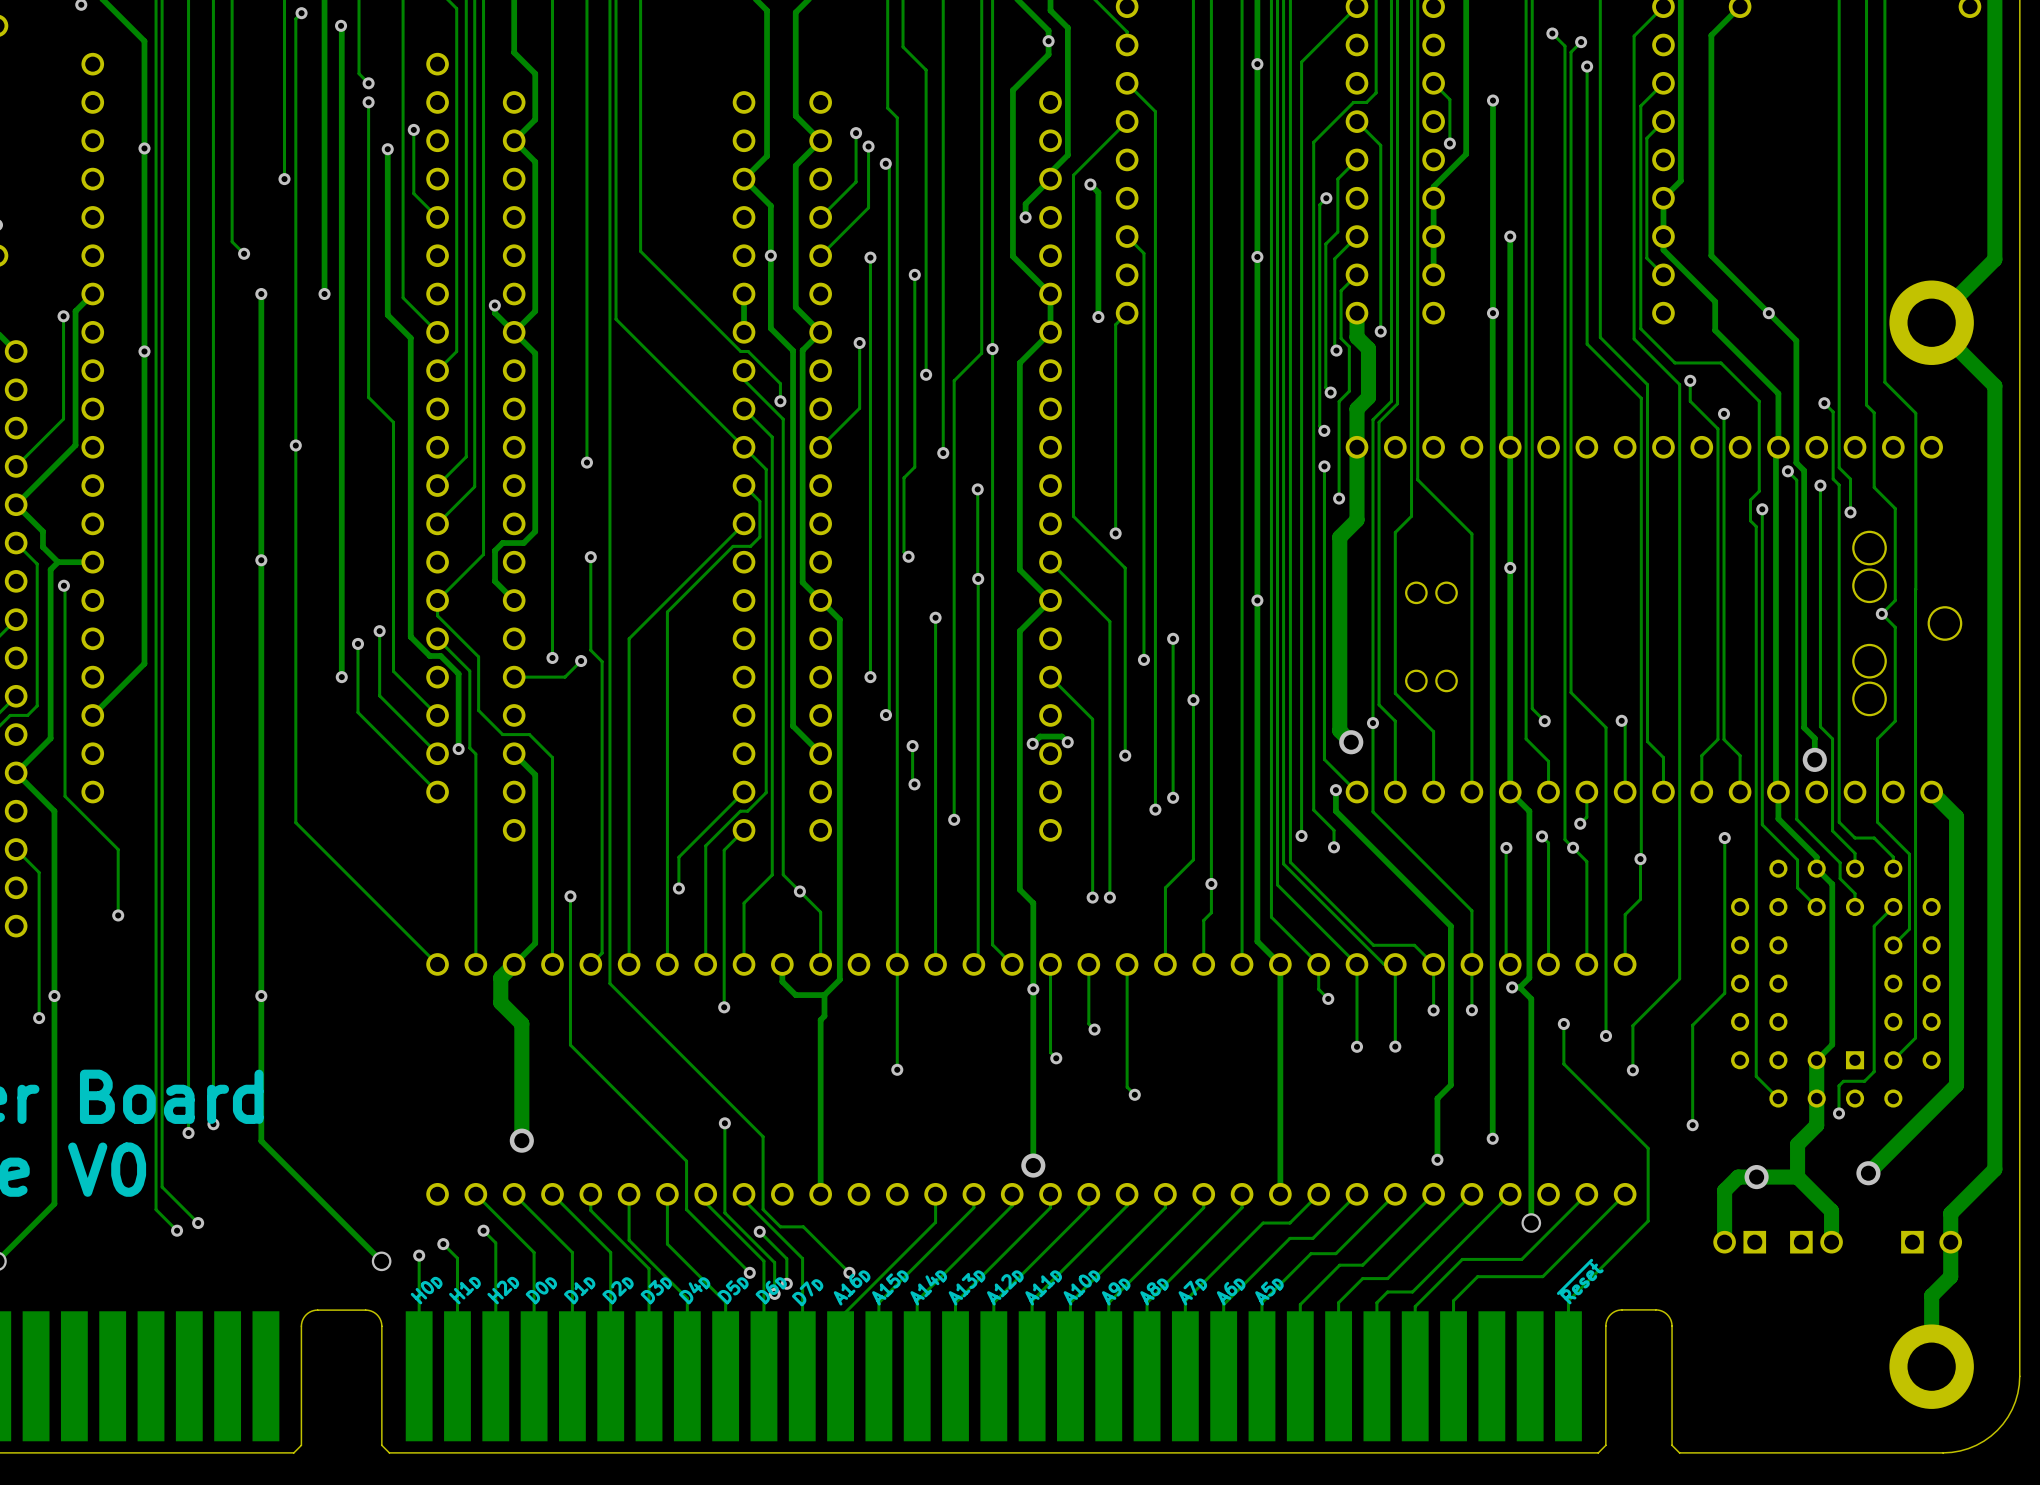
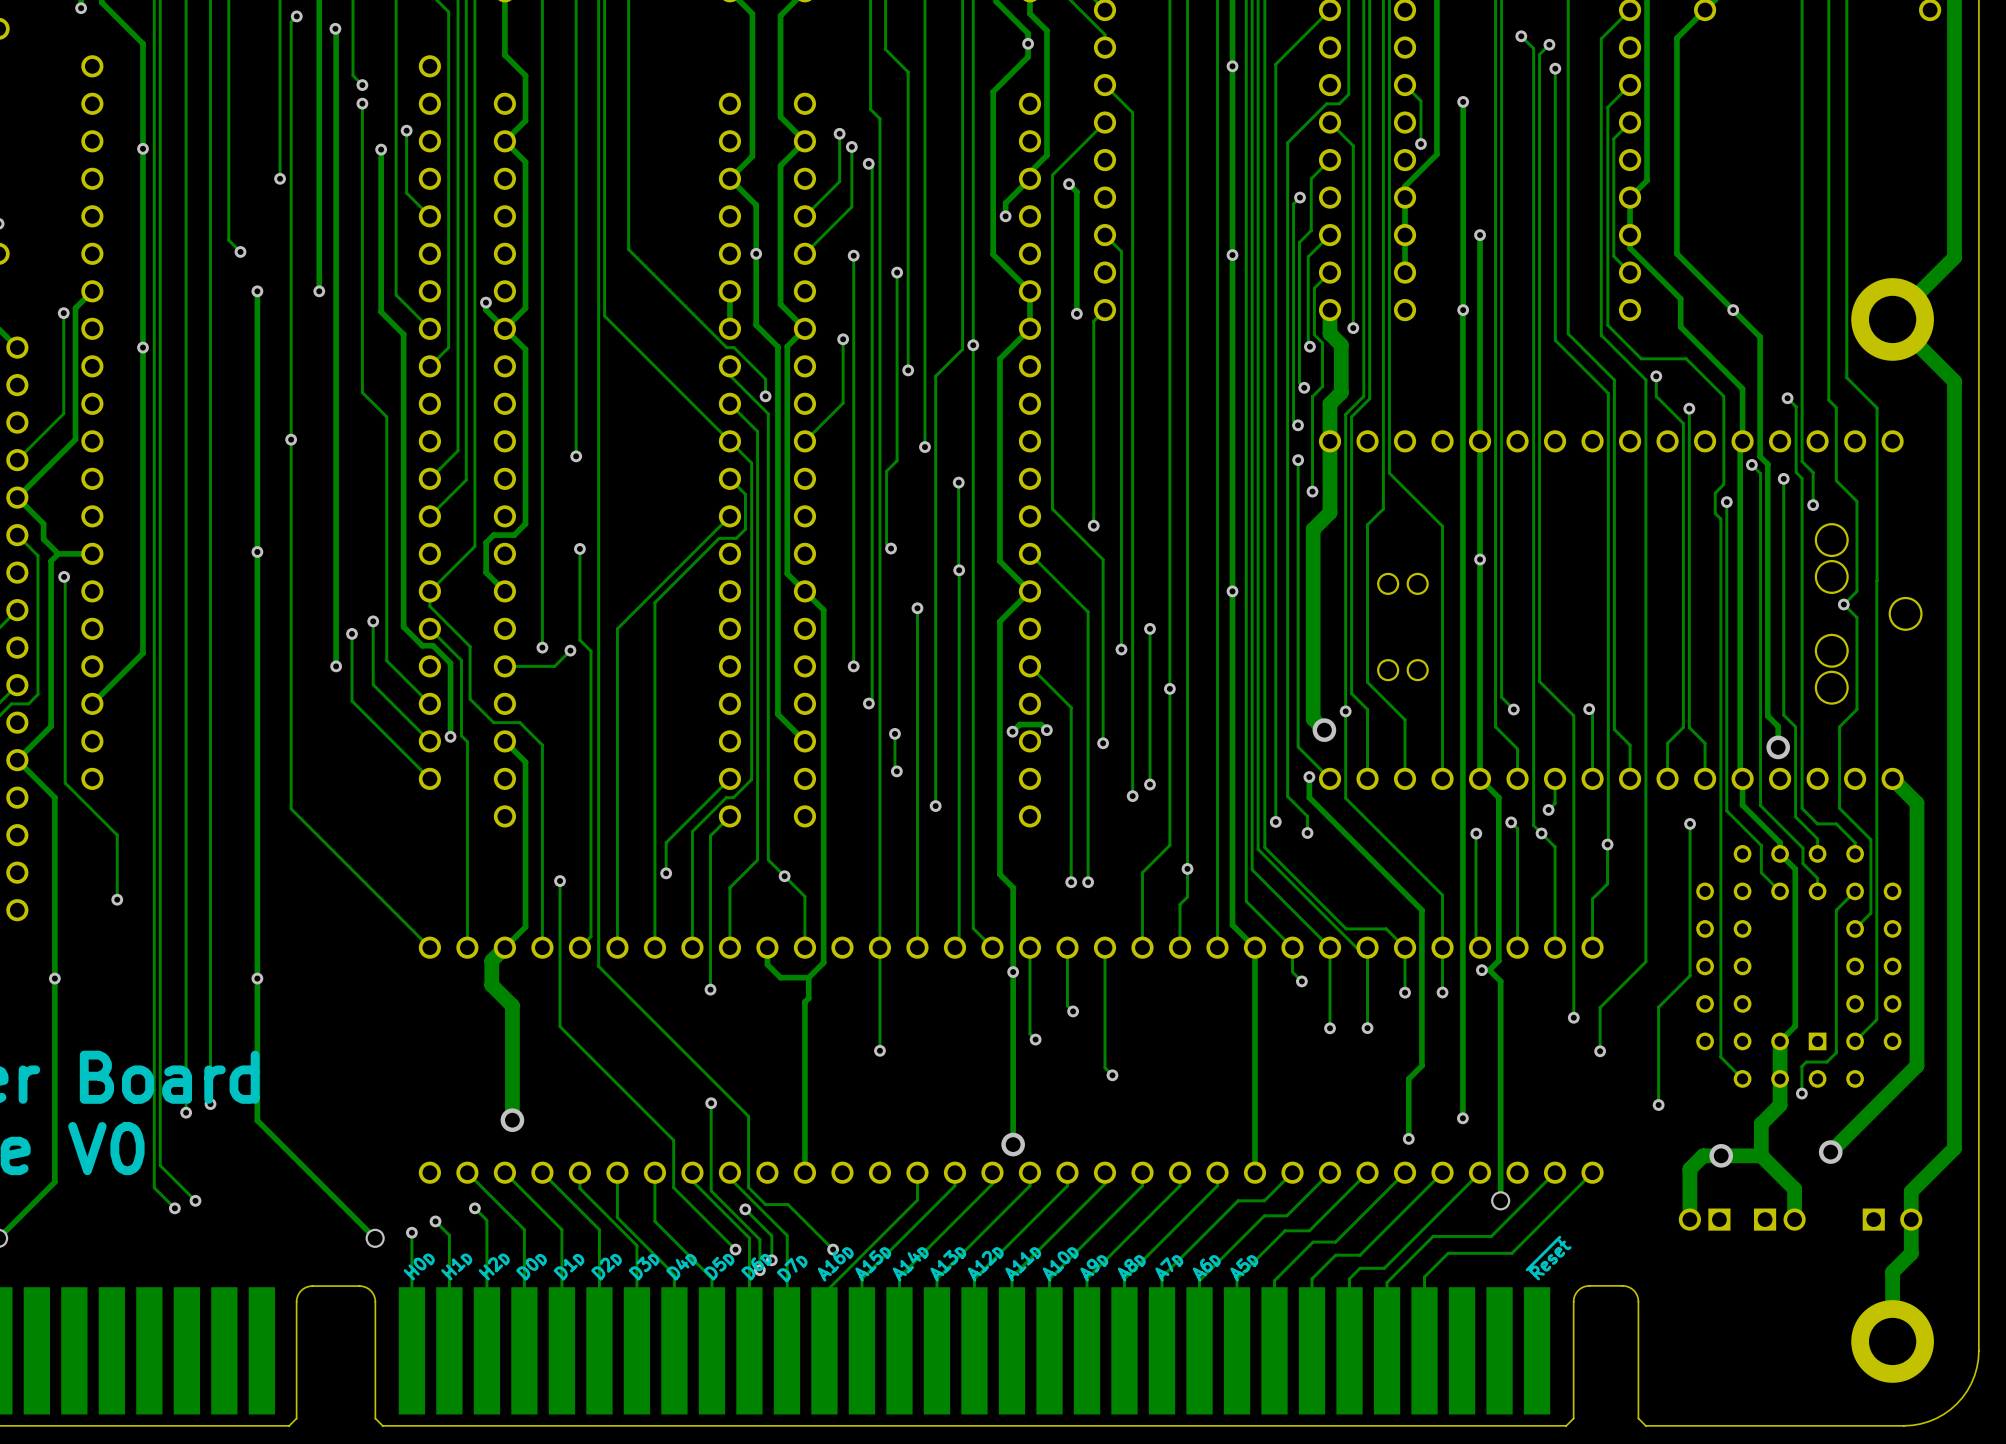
track: (16, 849) (39, 872) (39, 1018) -> none
via: (39, 1018) -> none
track: (1563, 1024) (1563, 1064) (1648, 1148) (1648, 1221) (1568, 1300) (1568, 1376) -> none
via: (1563, 1024) -> none

